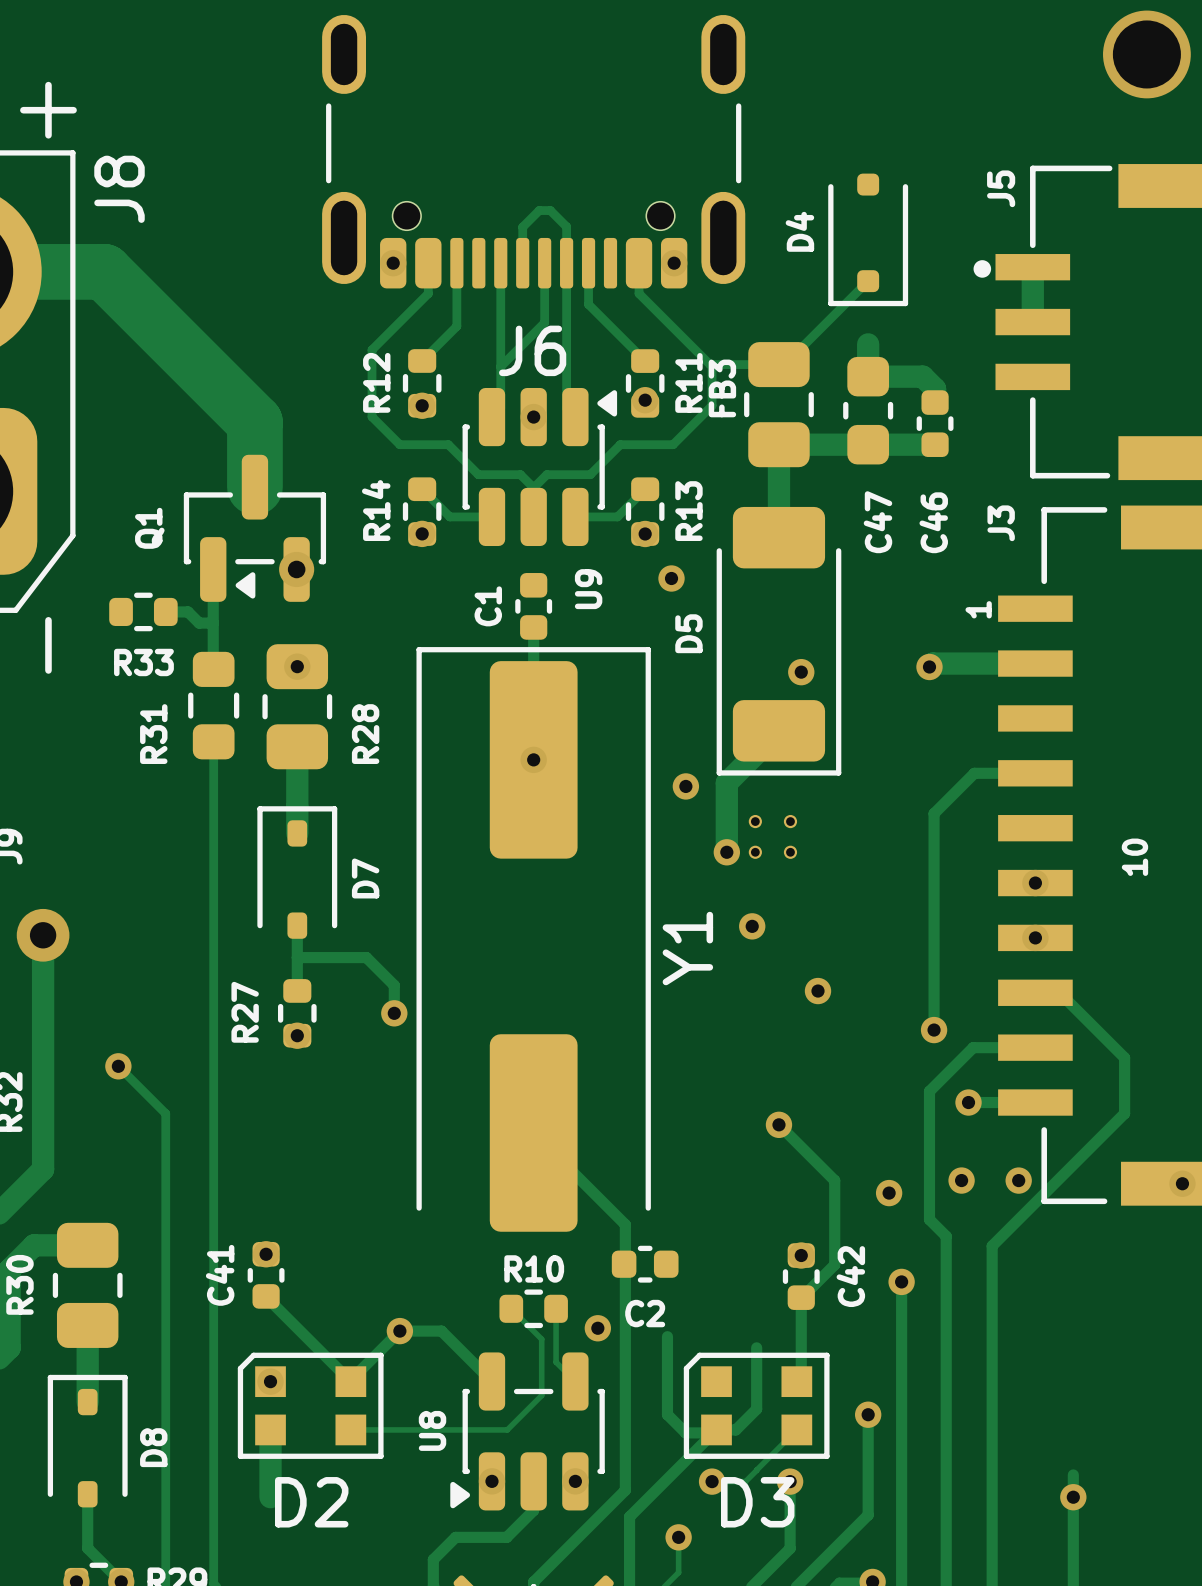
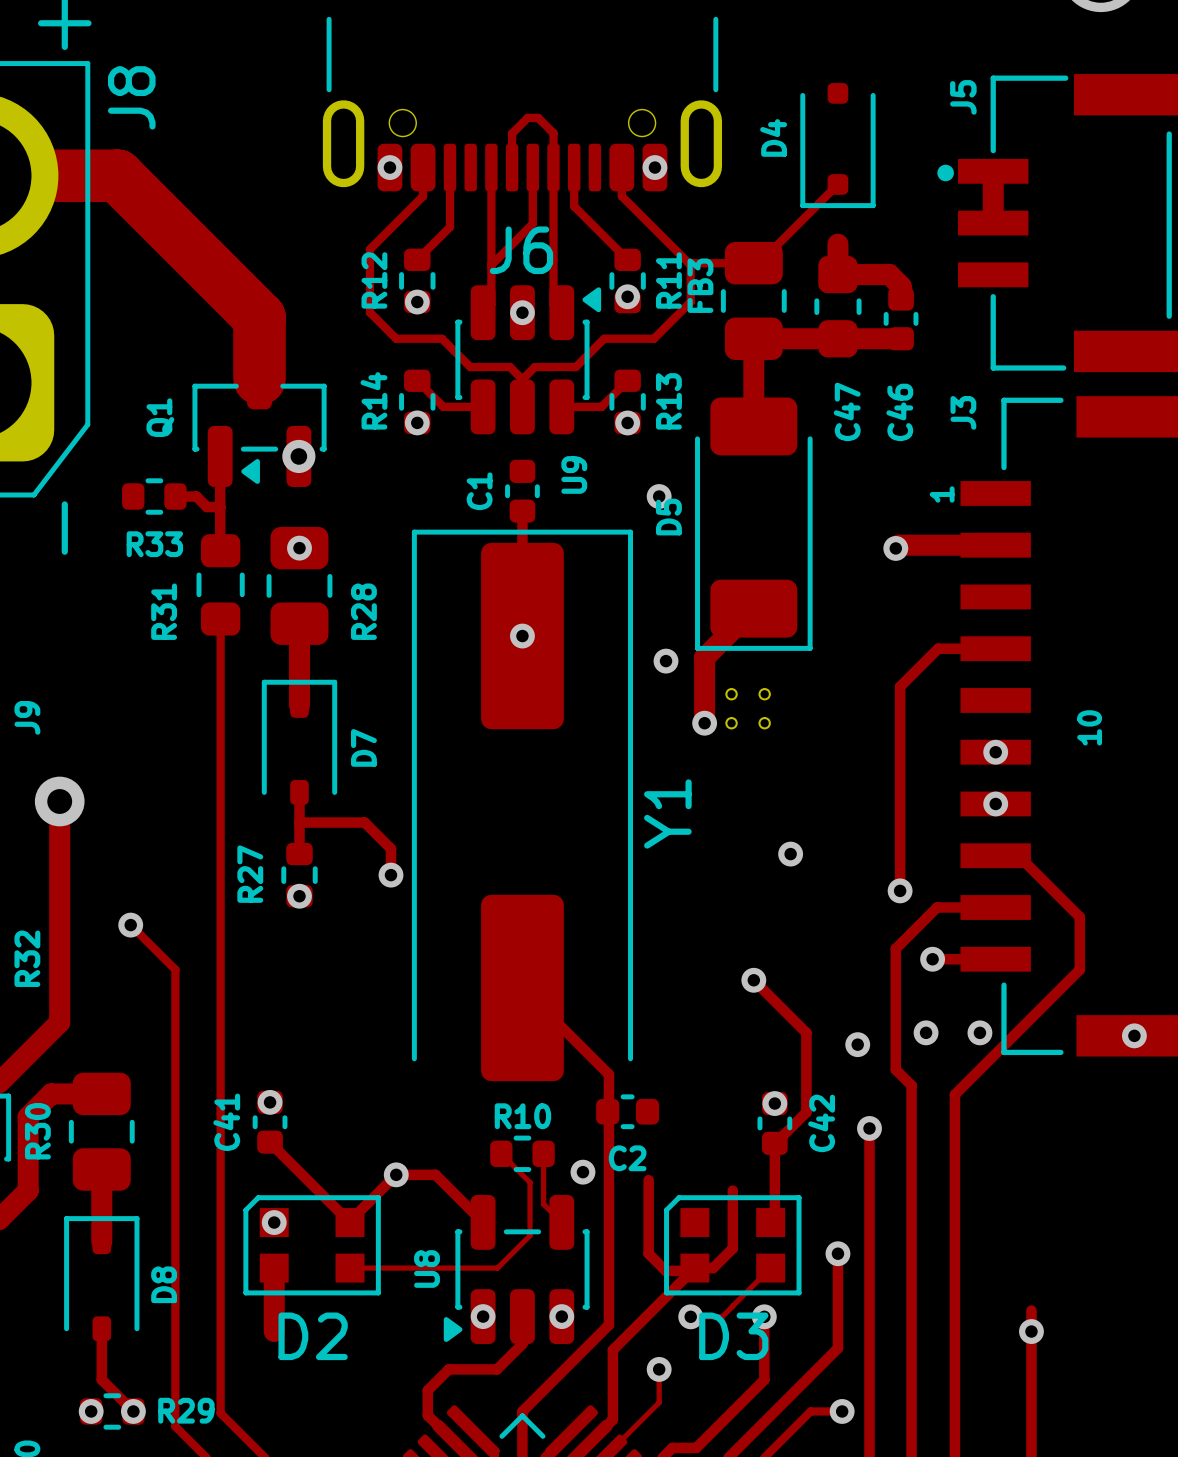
via position: (671, 578) -> (659, 496)
via: (801, 672) -> none
via: (752, 926) -> none

